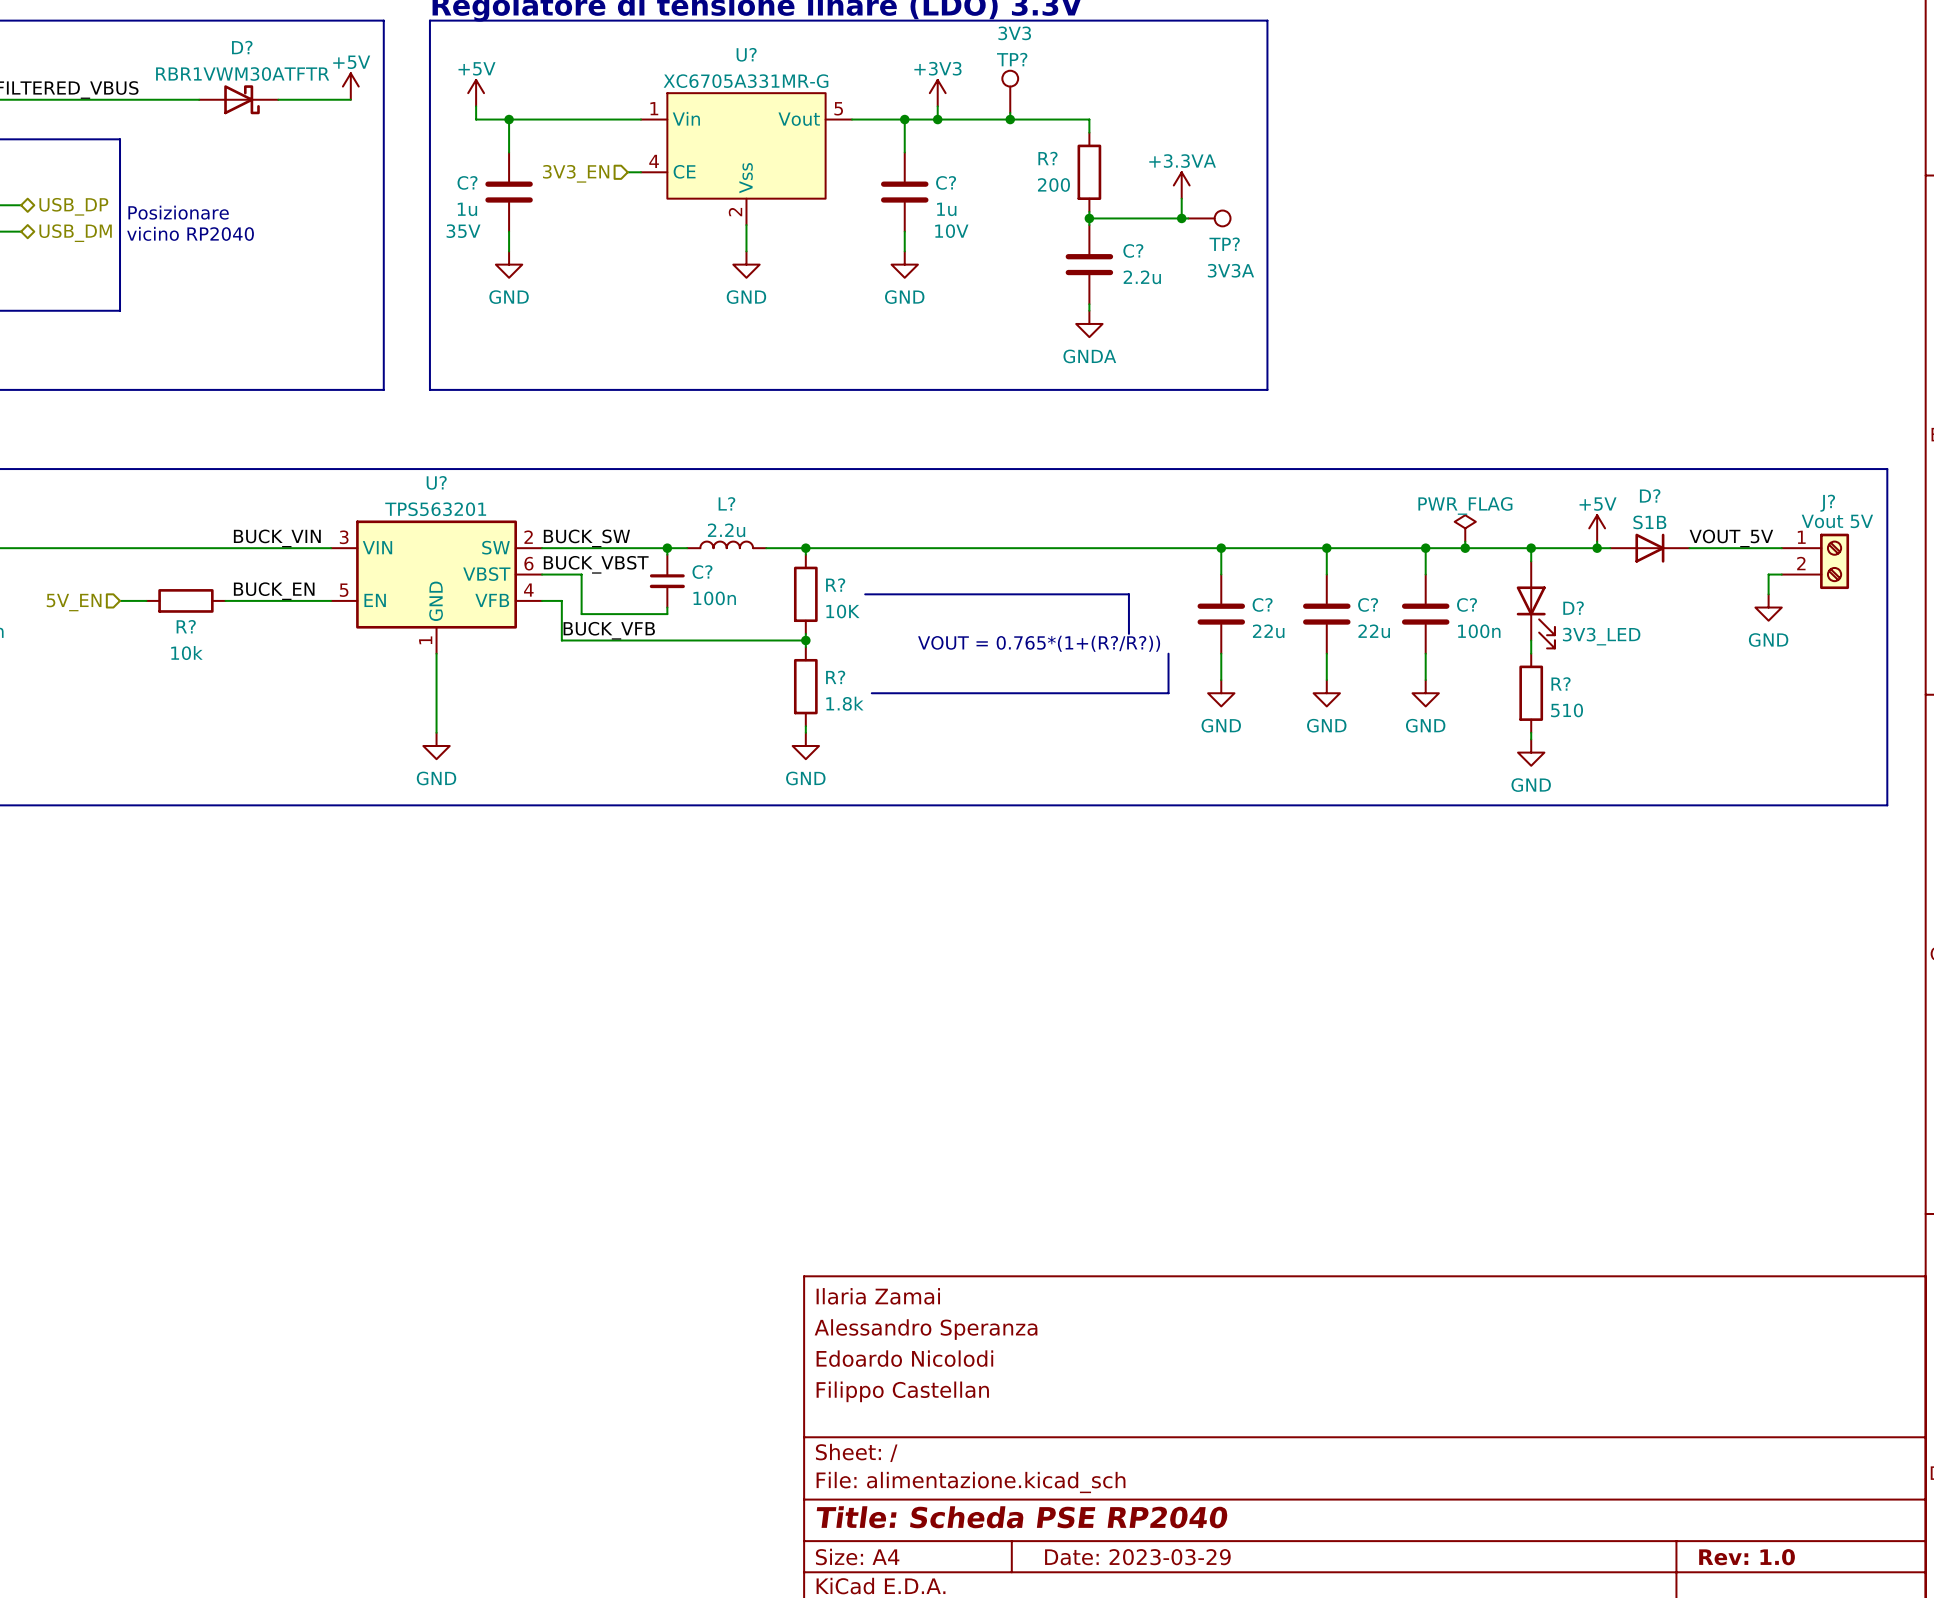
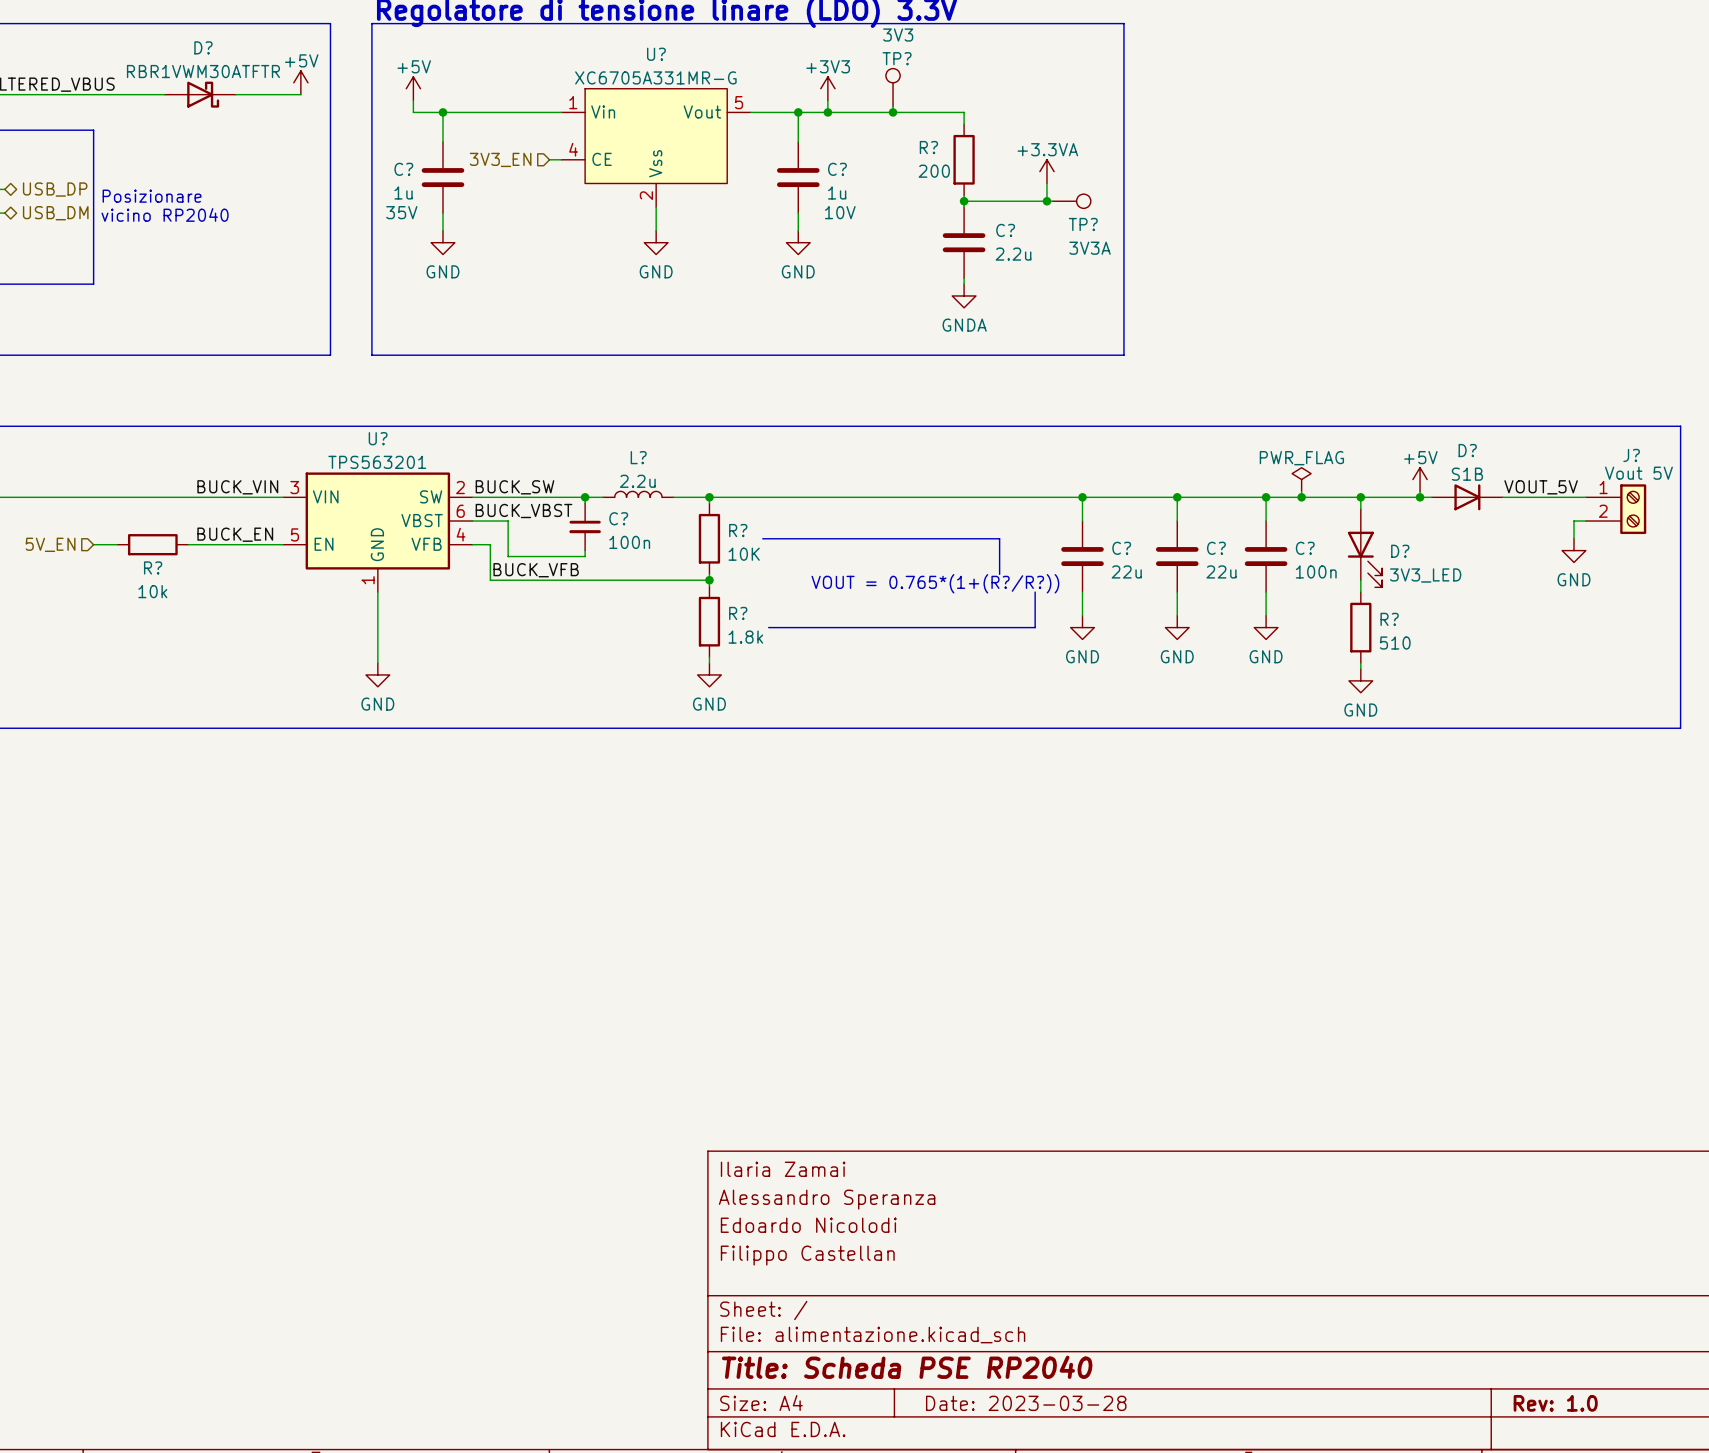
title block: Date: 2023-03-29 (1137, 1557) -> Date: 2023-03-28 (1026, 1403)

